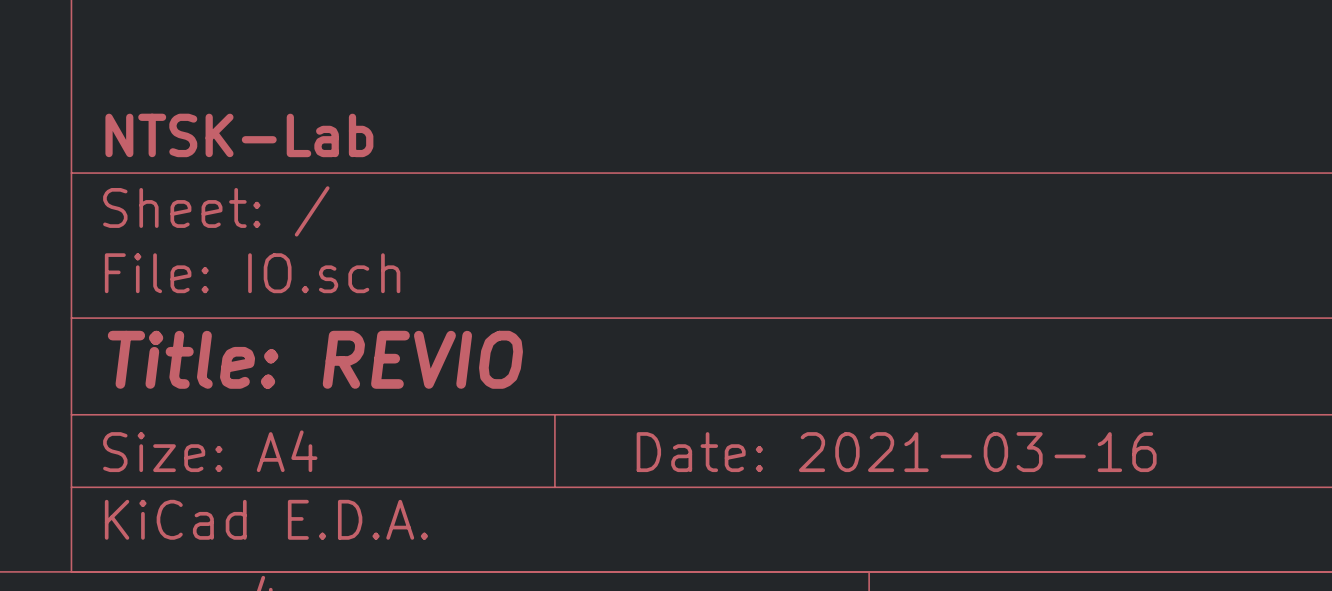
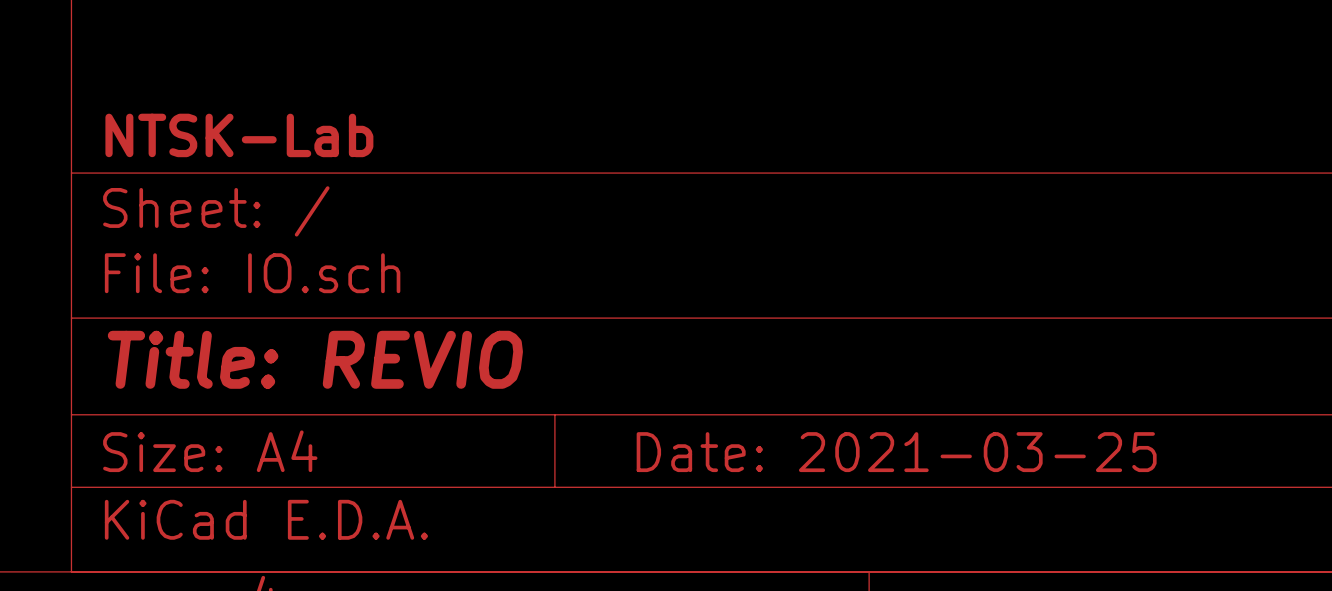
title block: Date: 2021-03-16 (896, 452) -> Date: 2021-03-25 (896, 452)

